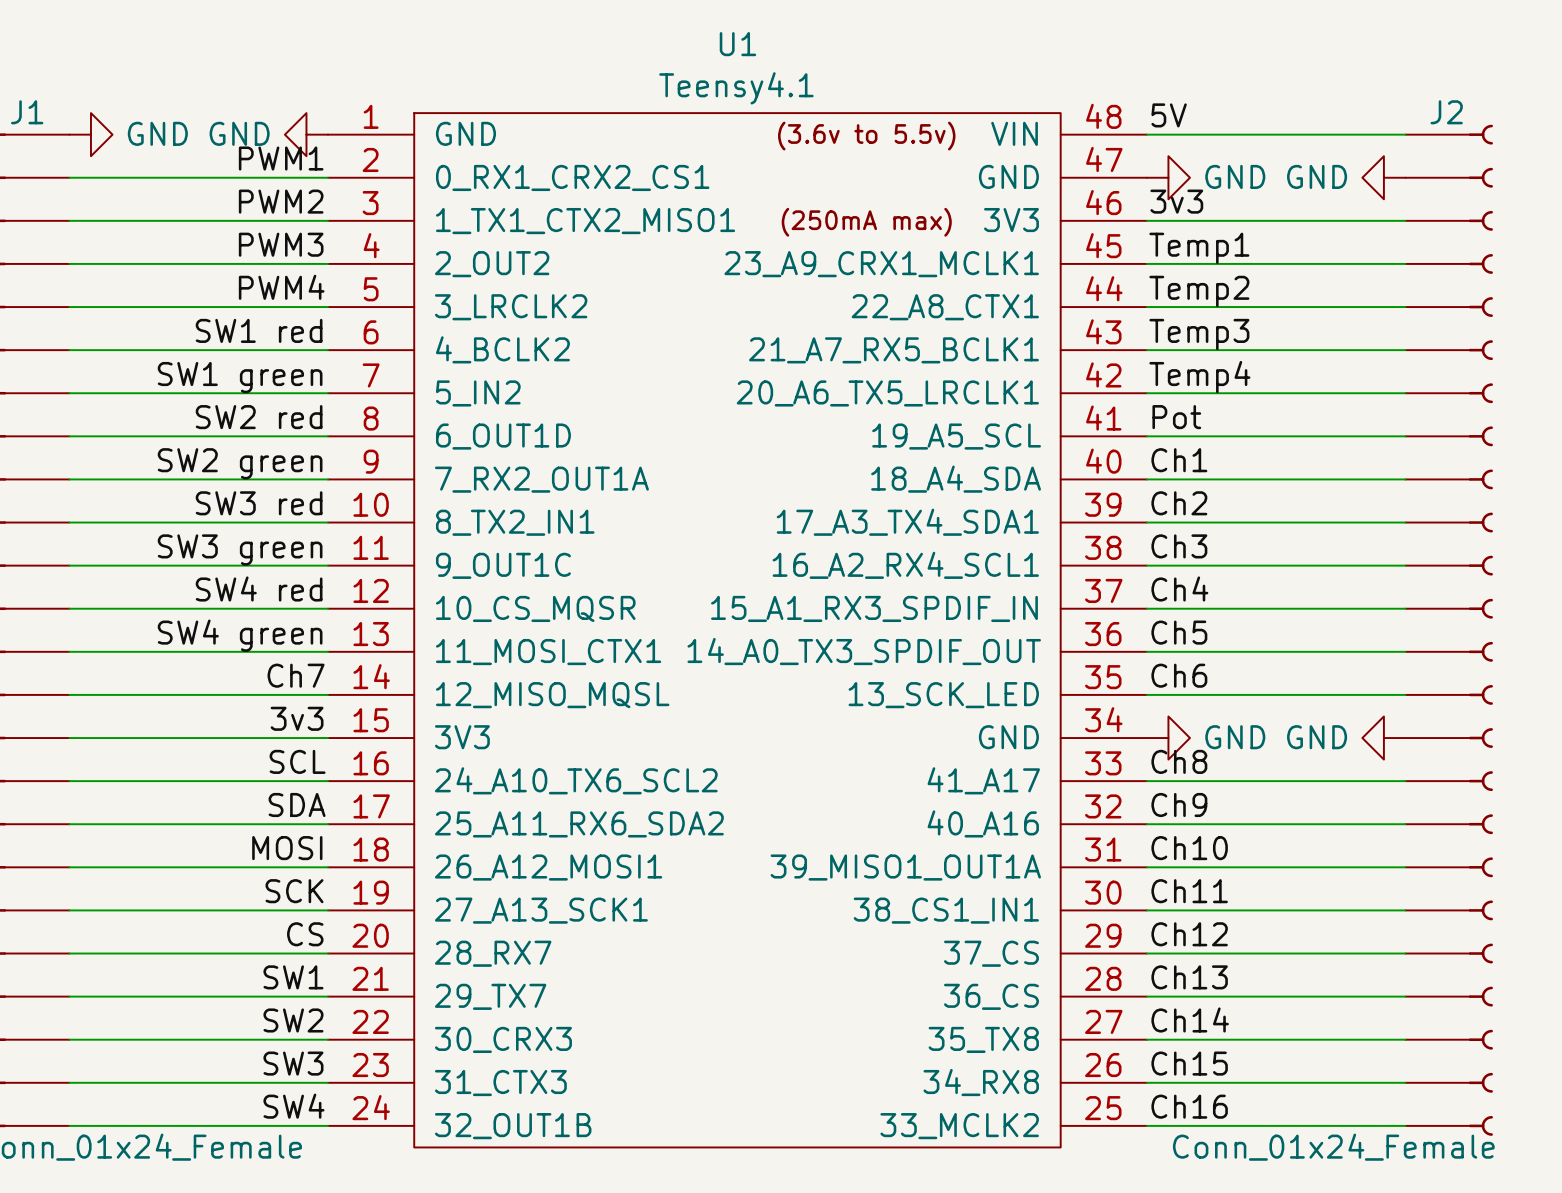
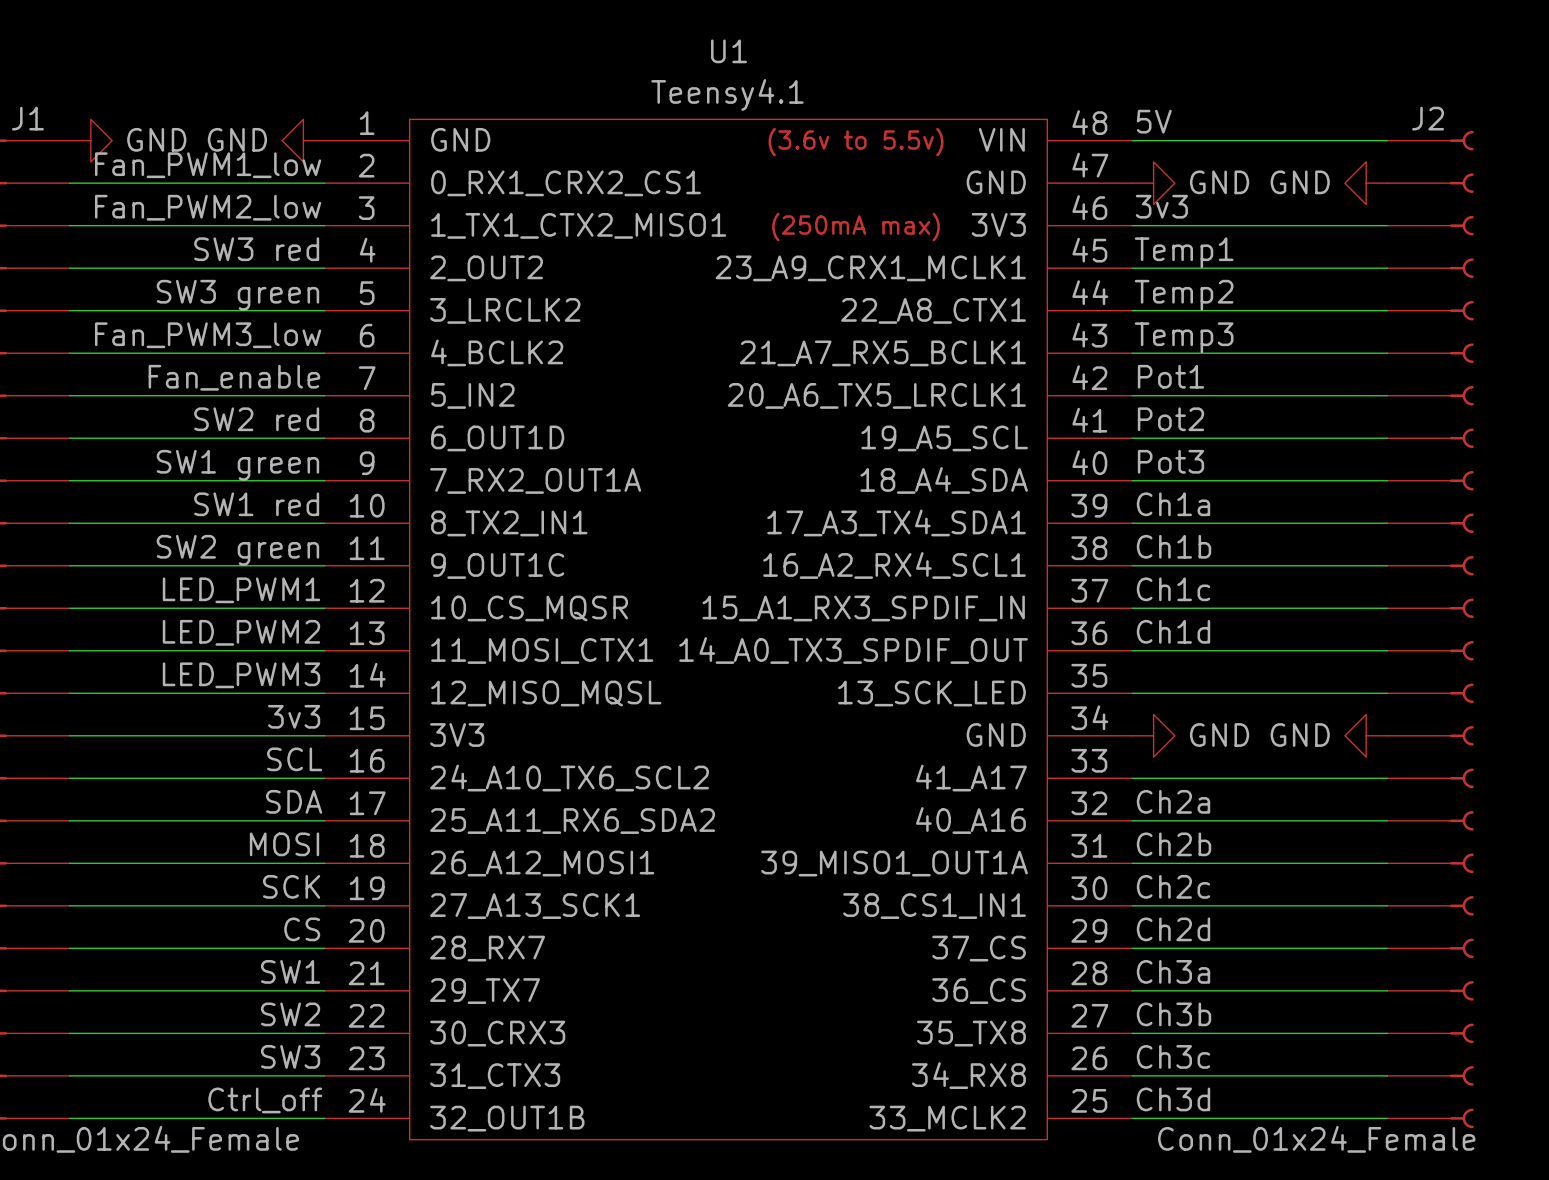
label: PWM1 (281, 158) -> Fan_PWM1_low (208, 165)
label: PWM2 (281, 201) -> Fan_PWM2_low (208, 207)
label: PWM3 (281, 244) -> SW3 red (256, 249)
label: PWM4 (281, 287) -> SW3 green (237, 295)
label: SW1 red (259, 330) -> Fan_PWM3_low (208, 335)
label: SW1 green (240, 377) -> Fan_enable (234, 377)
label: Temp4 (1199, 377) -> Pot1 (1170, 376)
label: Pot (1176, 417) -> Pot2 (1170, 419)
label: Ch1 (1179, 460) -> Pot3 (1170, 461)
label: SW2 green (240, 463) -> SW1 green (237, 465)
label: SW3 red (259, 503) -> SW1 red (256, 504)
label: Ch2 (1179, 503) -> Ch1a (1173, 504)
label: Ch3 (1179, 546) -> Ch1b (1174, 546)
label: SW3 green (240, 549) -> SW2 green (237, 550)
label: SW4 red (259, 588) -> LED_PWM1 (241, 590)
label: Ch4 (1179, 588) -> Ch1c (1173, 589)
label: Ch5 (1179, 632) -> Ch1d (1173, 631)
label: SW4 green (240, 635) -> LED_PWM2 (241, 632)
label: Ch7 (296, 675) -> LED_PWM3 (241, 675)
label: Ch6 (1179, 675) -> none
label: Ch8 (1179, 761) -> none
label: Ch9 (1179, 804) -> Ch2a (1173, 801)
label: Ch10 (1189, 848) -> Ch2b (1174, 844)
label: Ch11 (1189, 891) -> Ch2c (1173, 886)
label: Ch12 (1189, 934) -> Ch2d (1173, 929)
label: Ch13 (1189, 977) -> Ch3a (1173, 971)
label: Ch14 (1190, 1019) -> Ch3b (1174, 1014)
label: Ch15 (1189, 1063) -> Ch3c (1173, 1056)
label: SW4 (293, 1106) -> Ctrl_off (265, 1100)
label: Ch16 (1189, 1106) -> Ch3d (1173, 1099)

